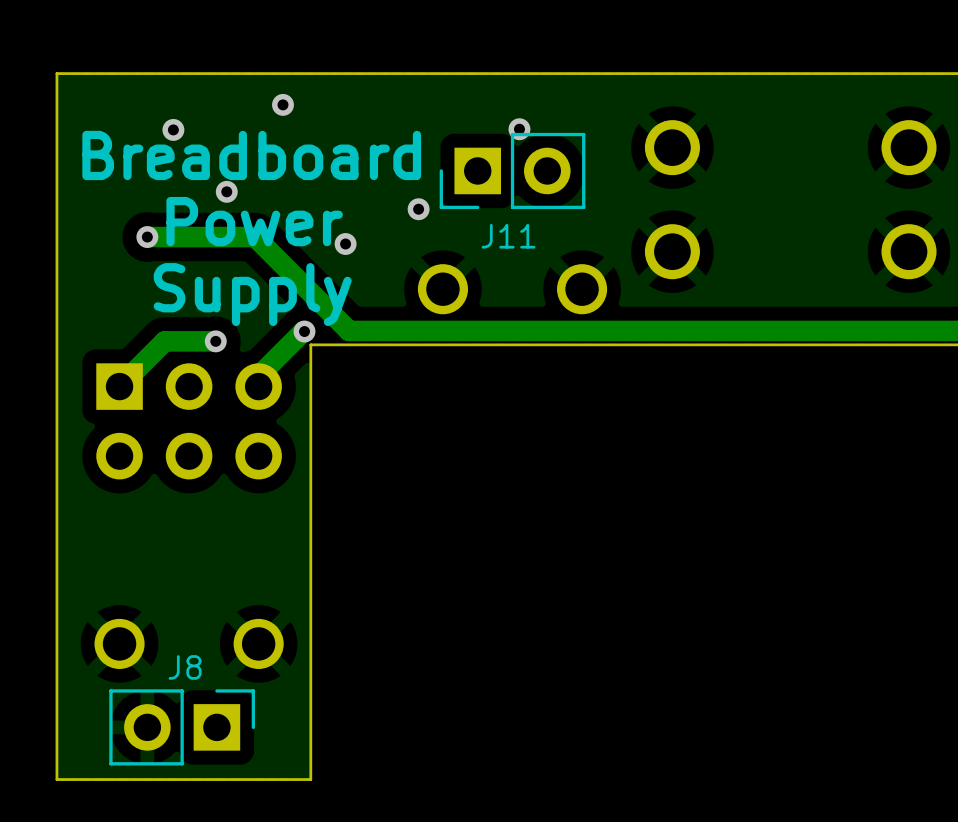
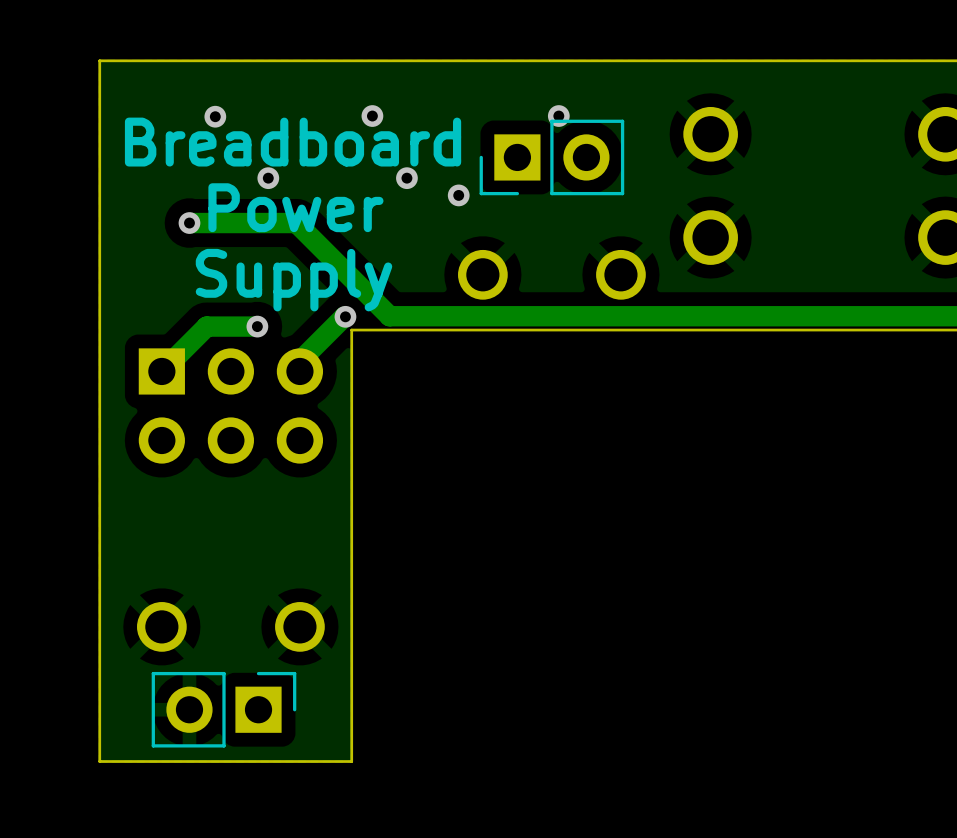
via position: (282, 104) -> (372, 116)
J11 name: J11 (508, 236) -> none
via position: (345, 243) -> (406, 178)
J8 name: J8 (185, 667) -> none

